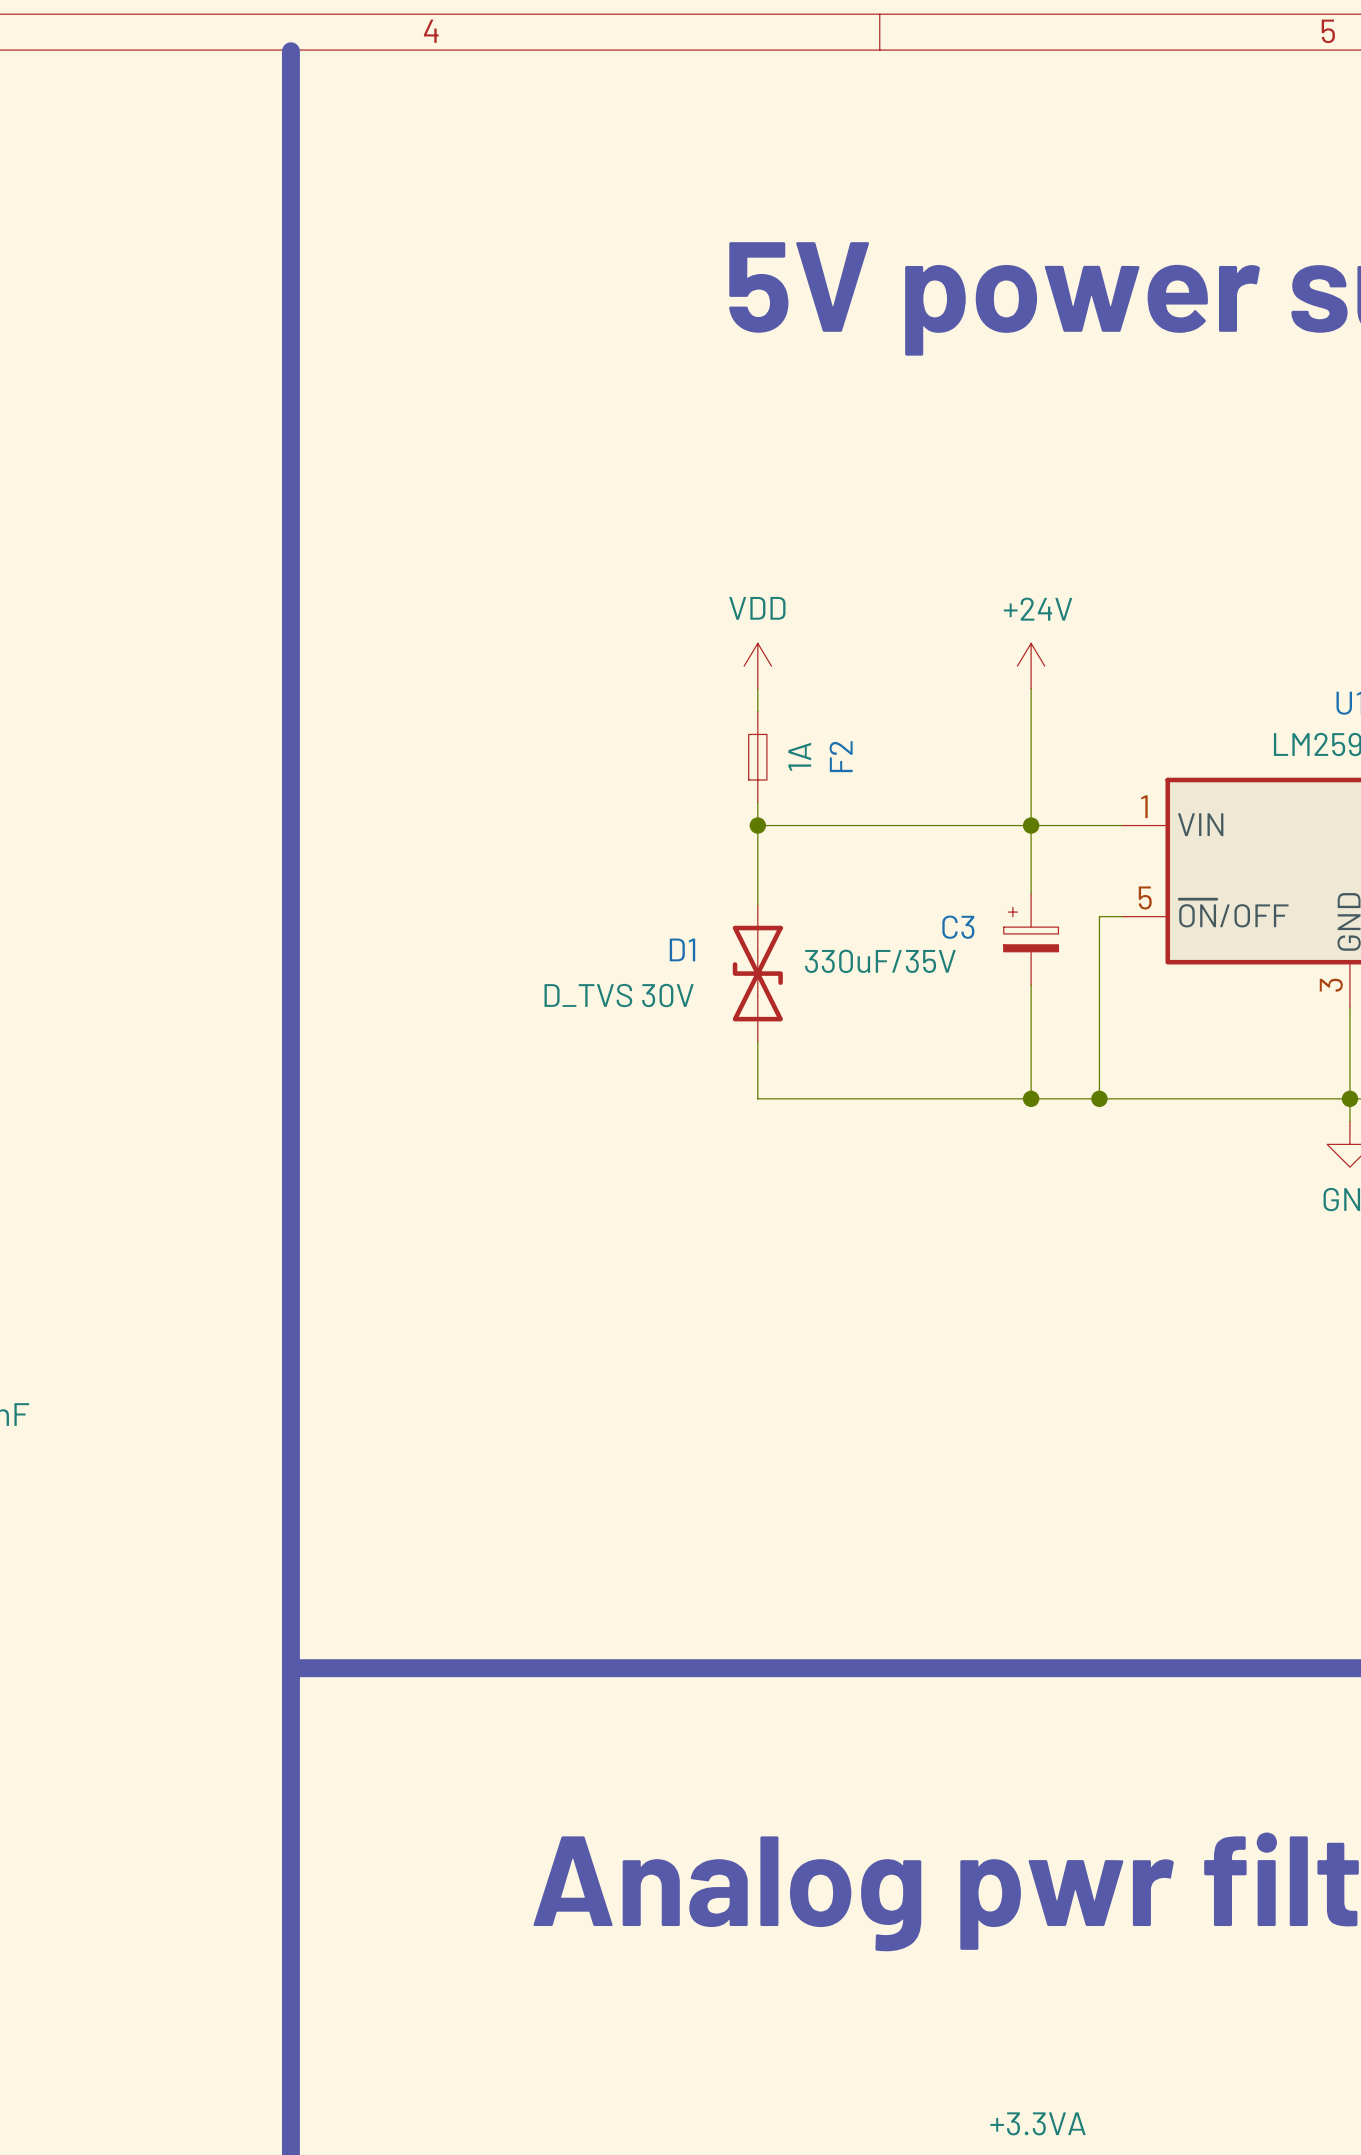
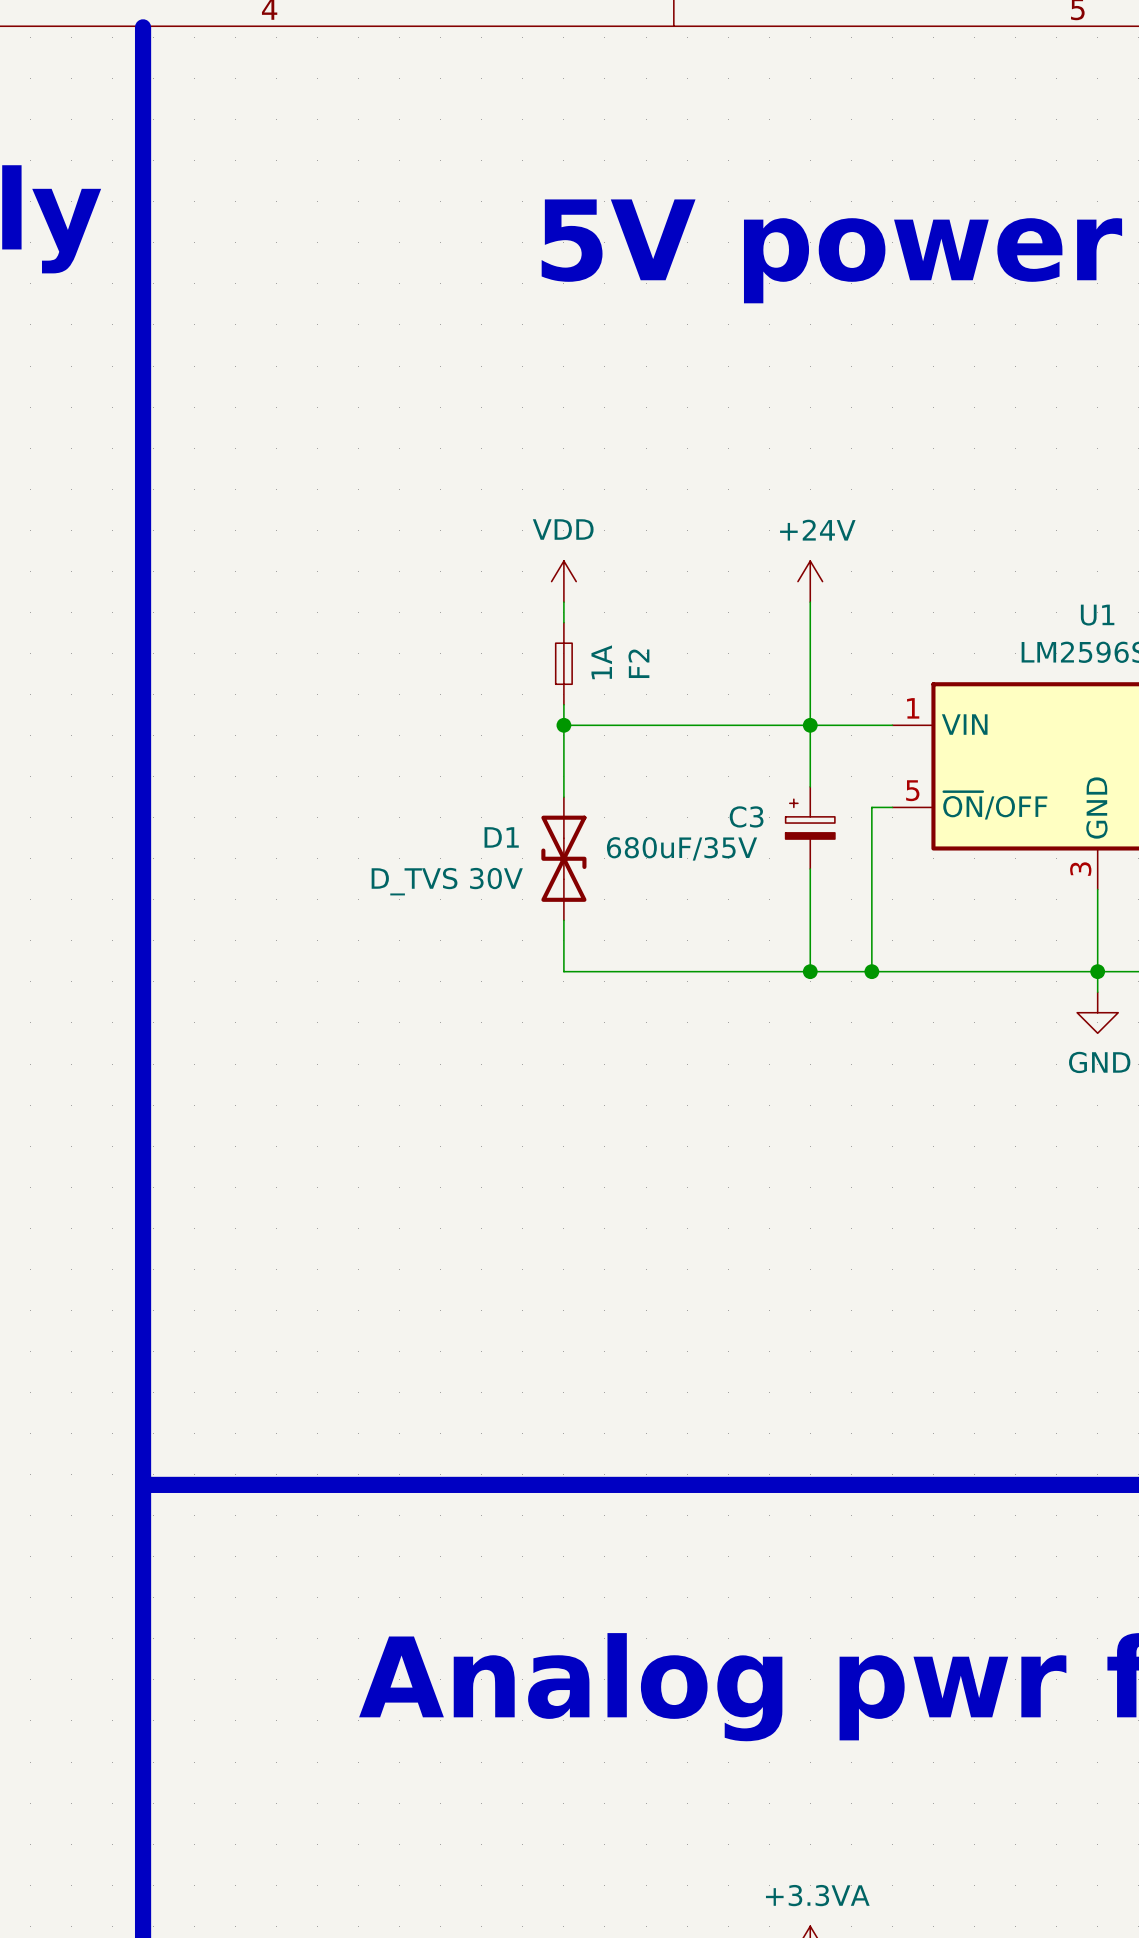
C3 value: 330uF/35V (880, 961) -> 680uF/35V (682, 848)

